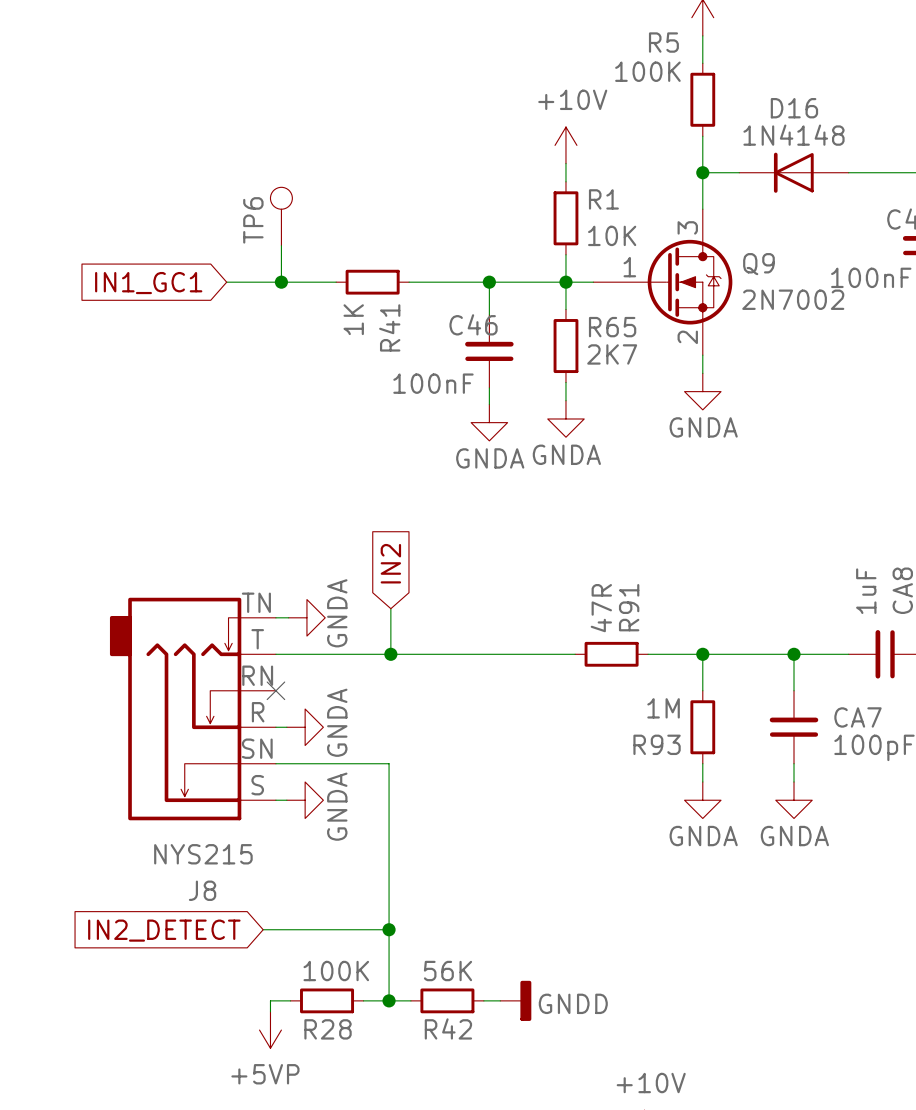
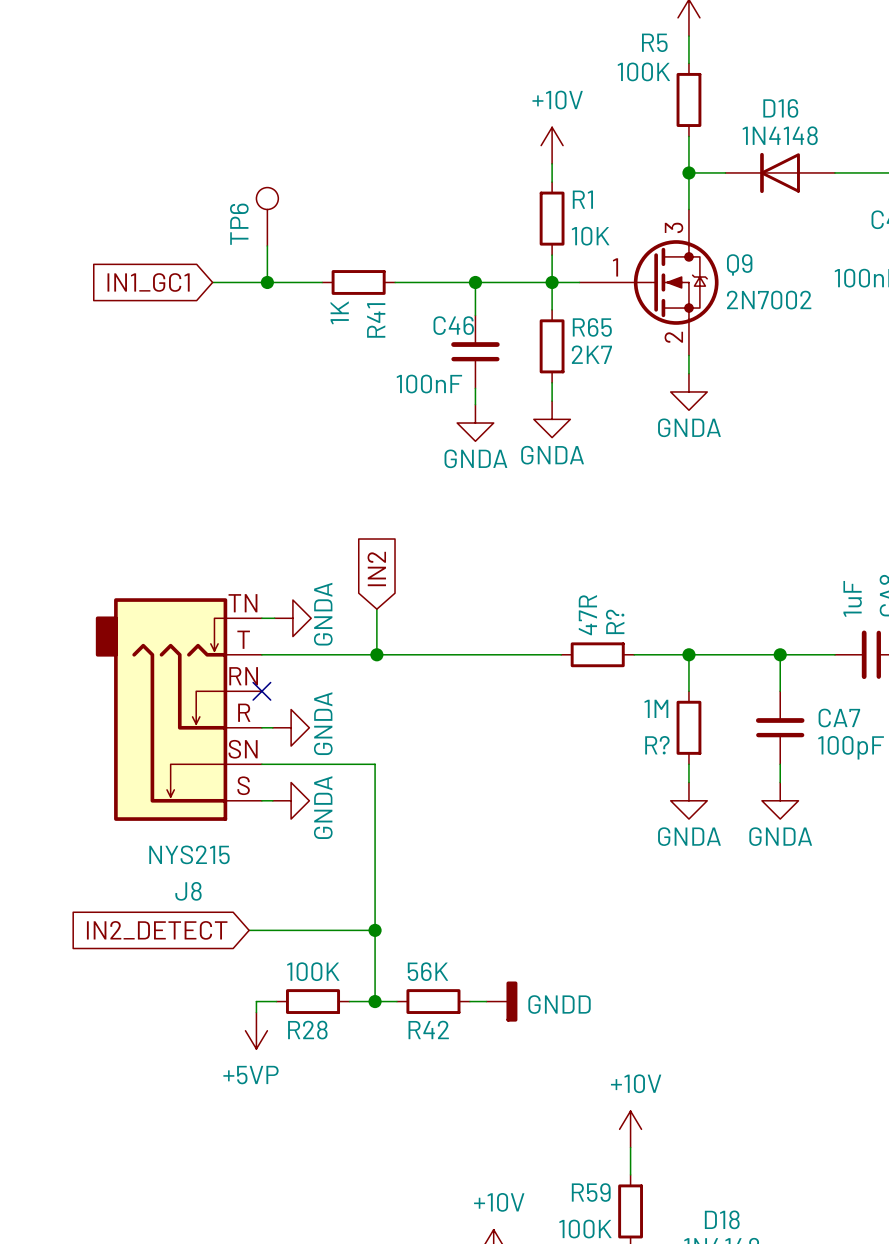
R91 name: R91 (629, 607) -> R? (615, 621)
R93 name: R93 (657, 744) -> R? (657, 745)

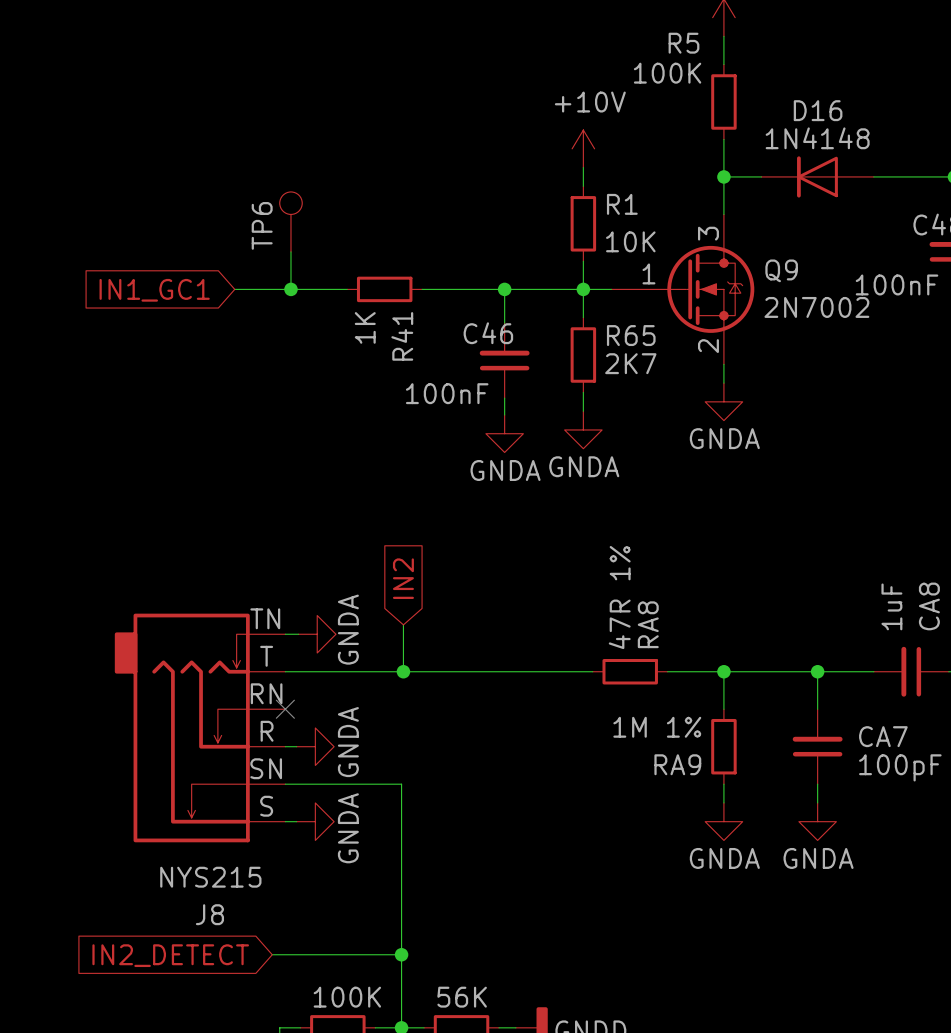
R? value: 47R (587, 615) -> 47R 1% (619, 597)
R? name: R? (615, 621) -> RA8 (648, 624)
R? value: 1M (656, 708) -> 1M 1% (657, 727)
R? name: R? (657, 745) -> RA9 (677, 764)

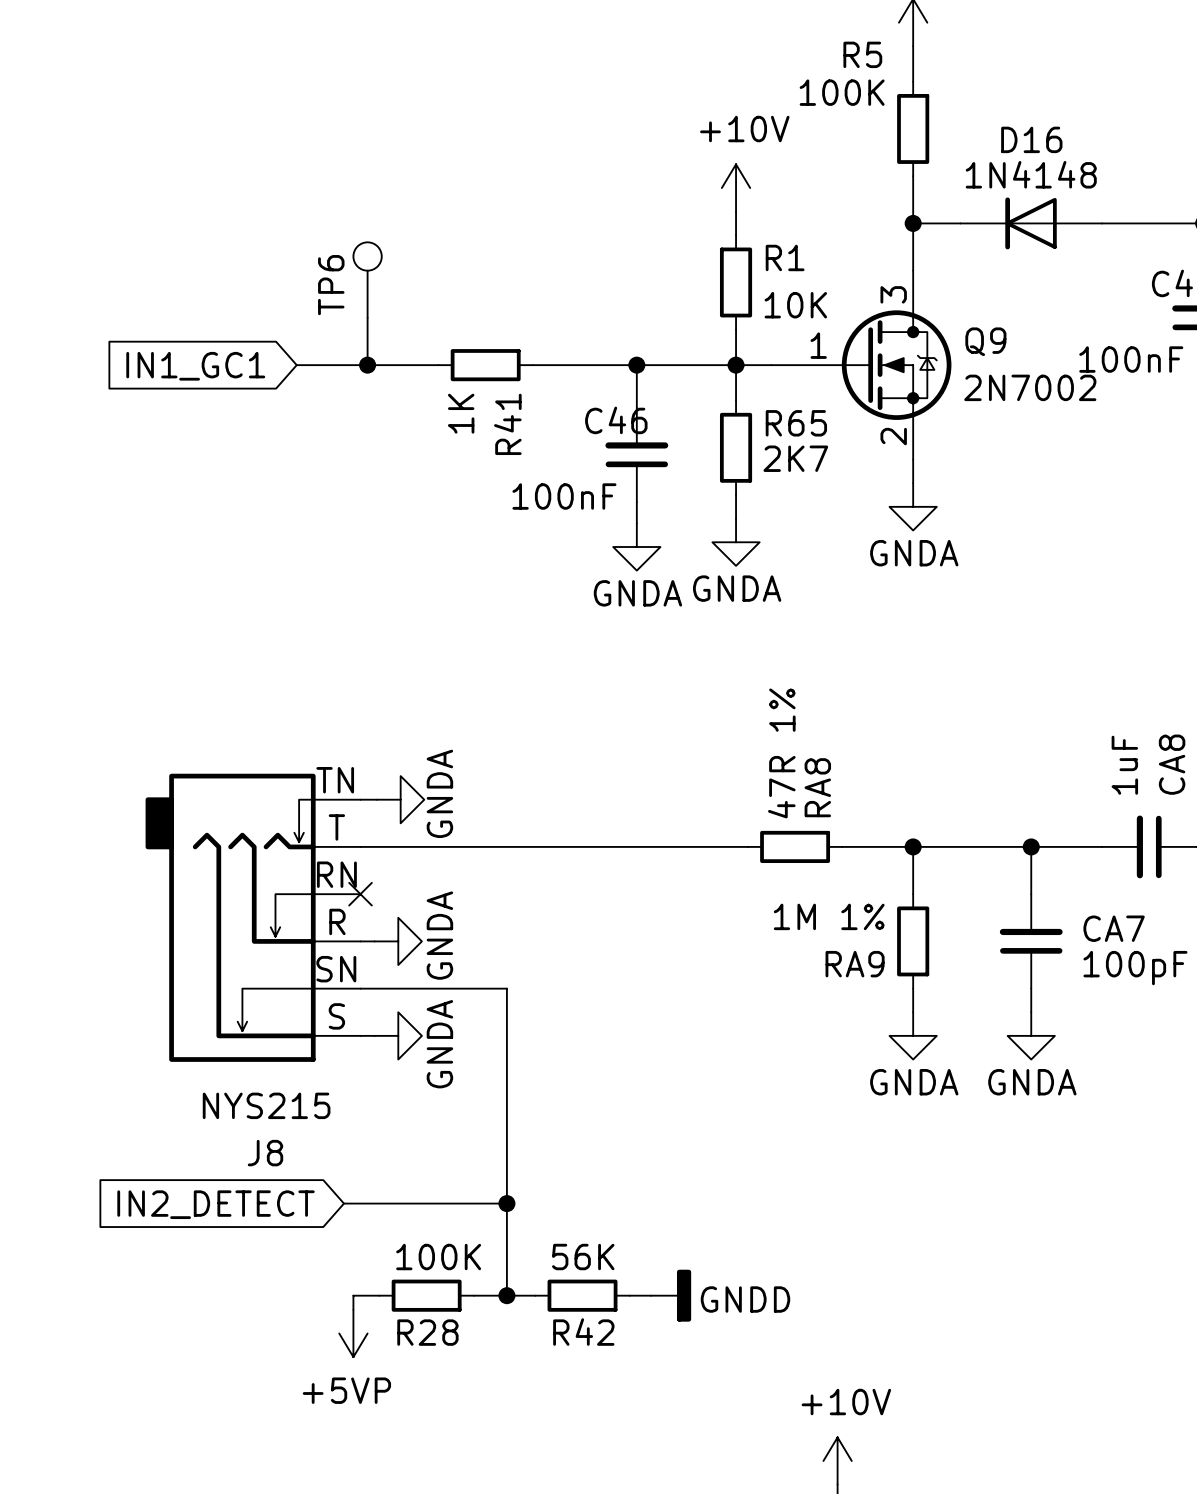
global label: IN2 (403, 578) -> none
wire: (403, 624) (403, 671) -> none
junction: (403, 671) -> none

